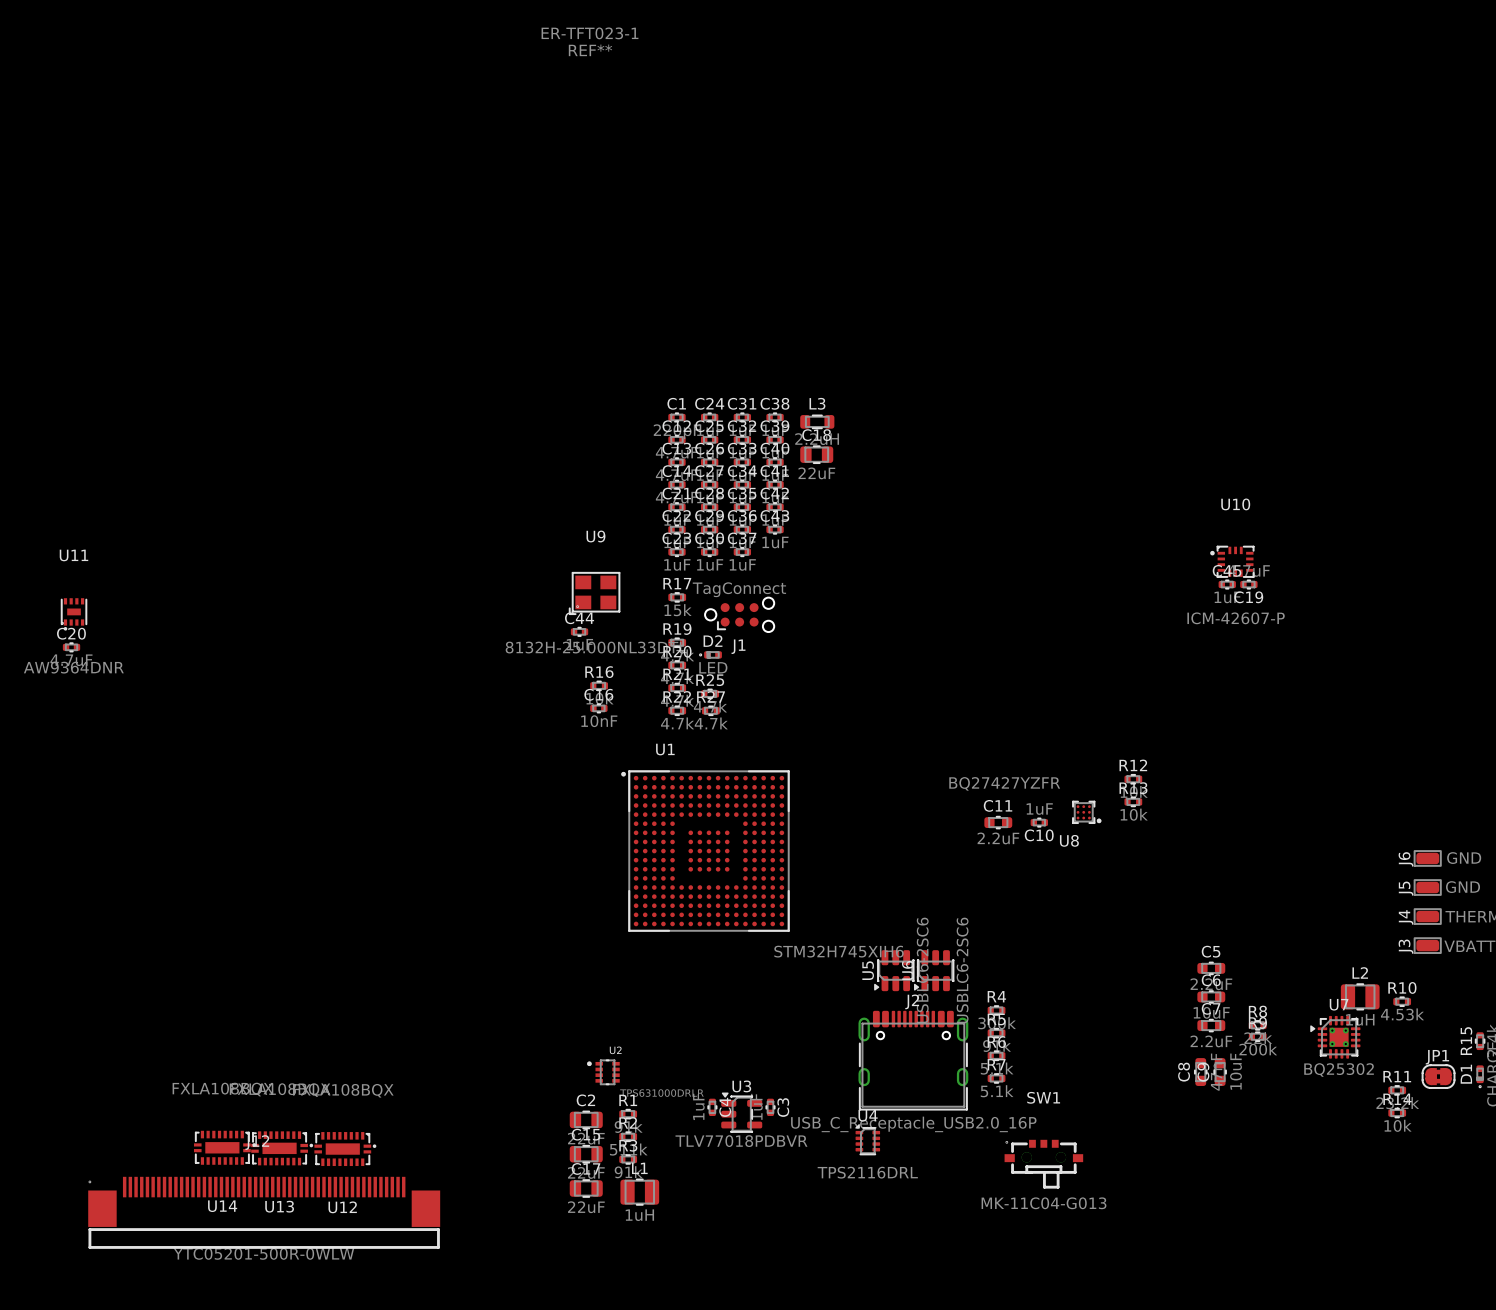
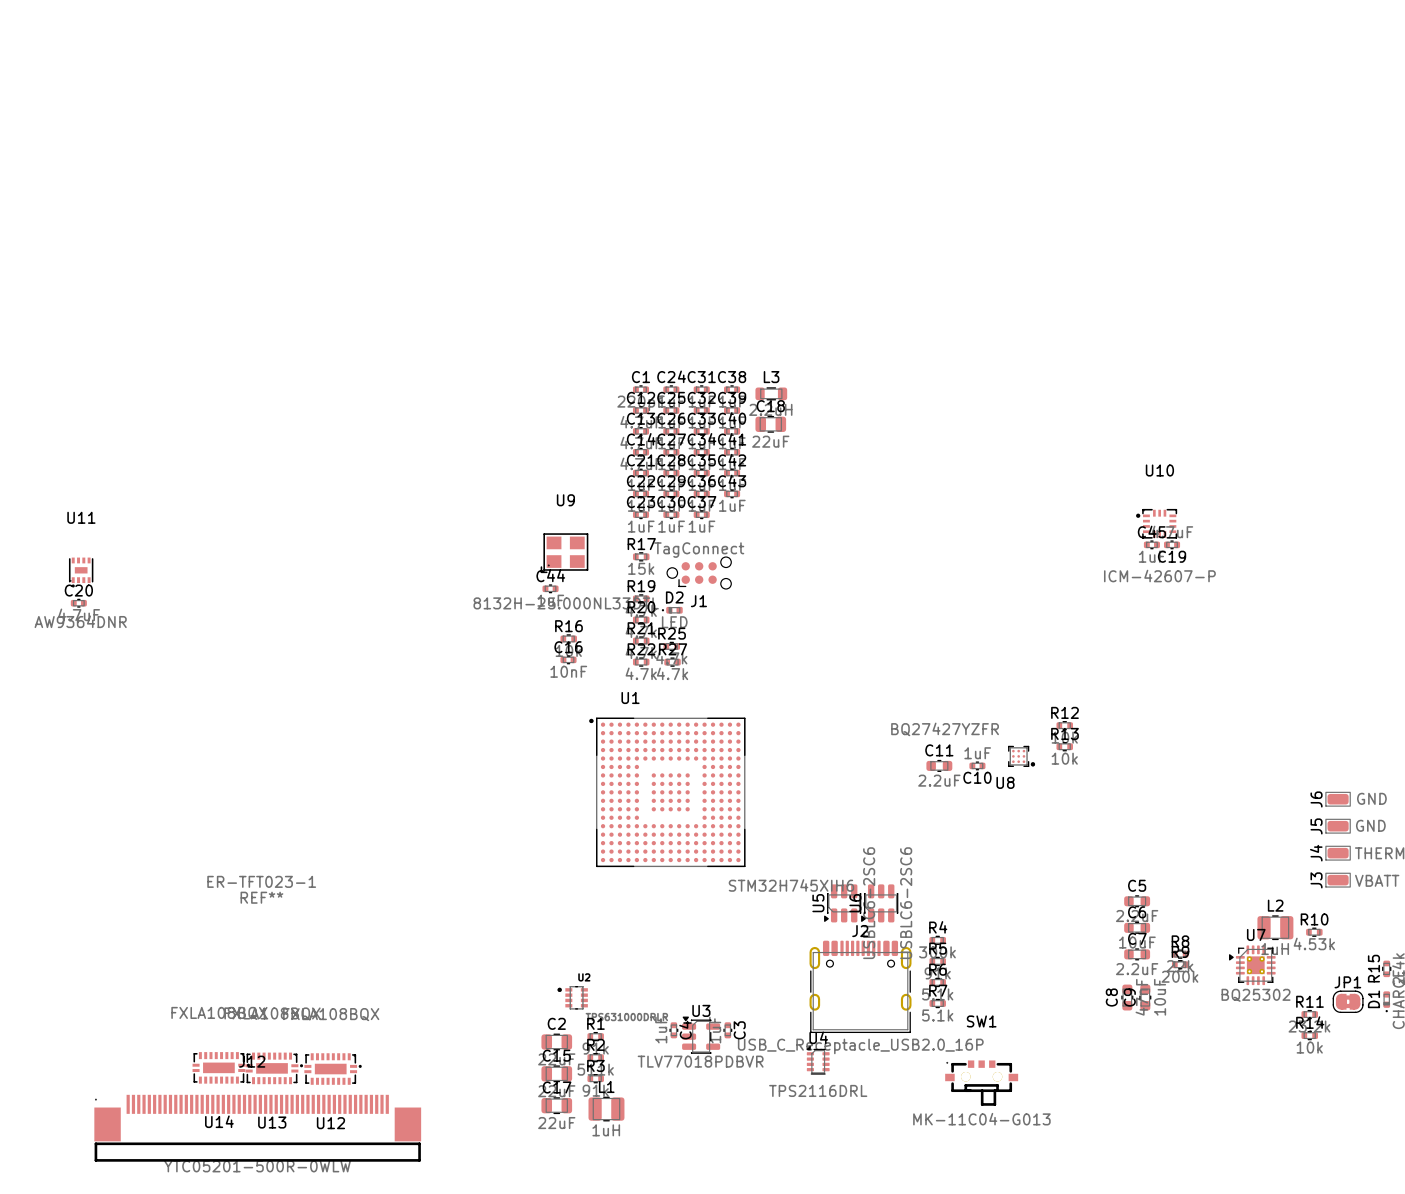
REF**: ER-TFT023-1 (590, 41) -> none
REF**: none -> ER-TFT023-1 (261, 889)

